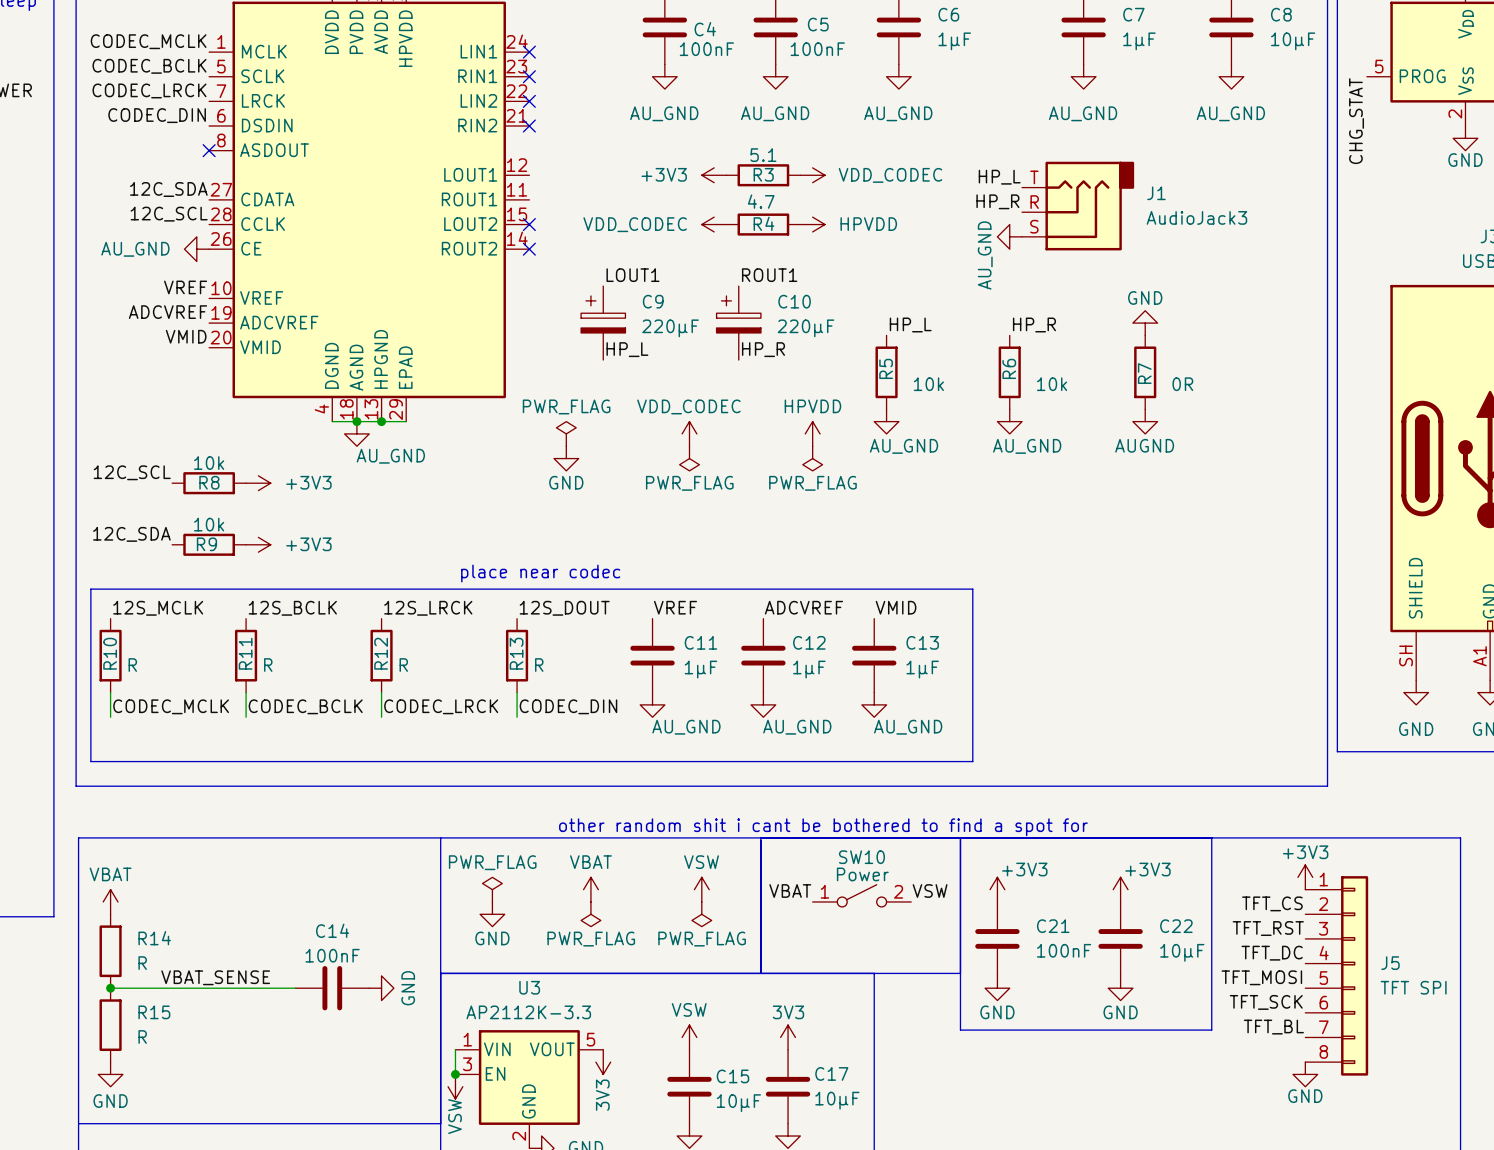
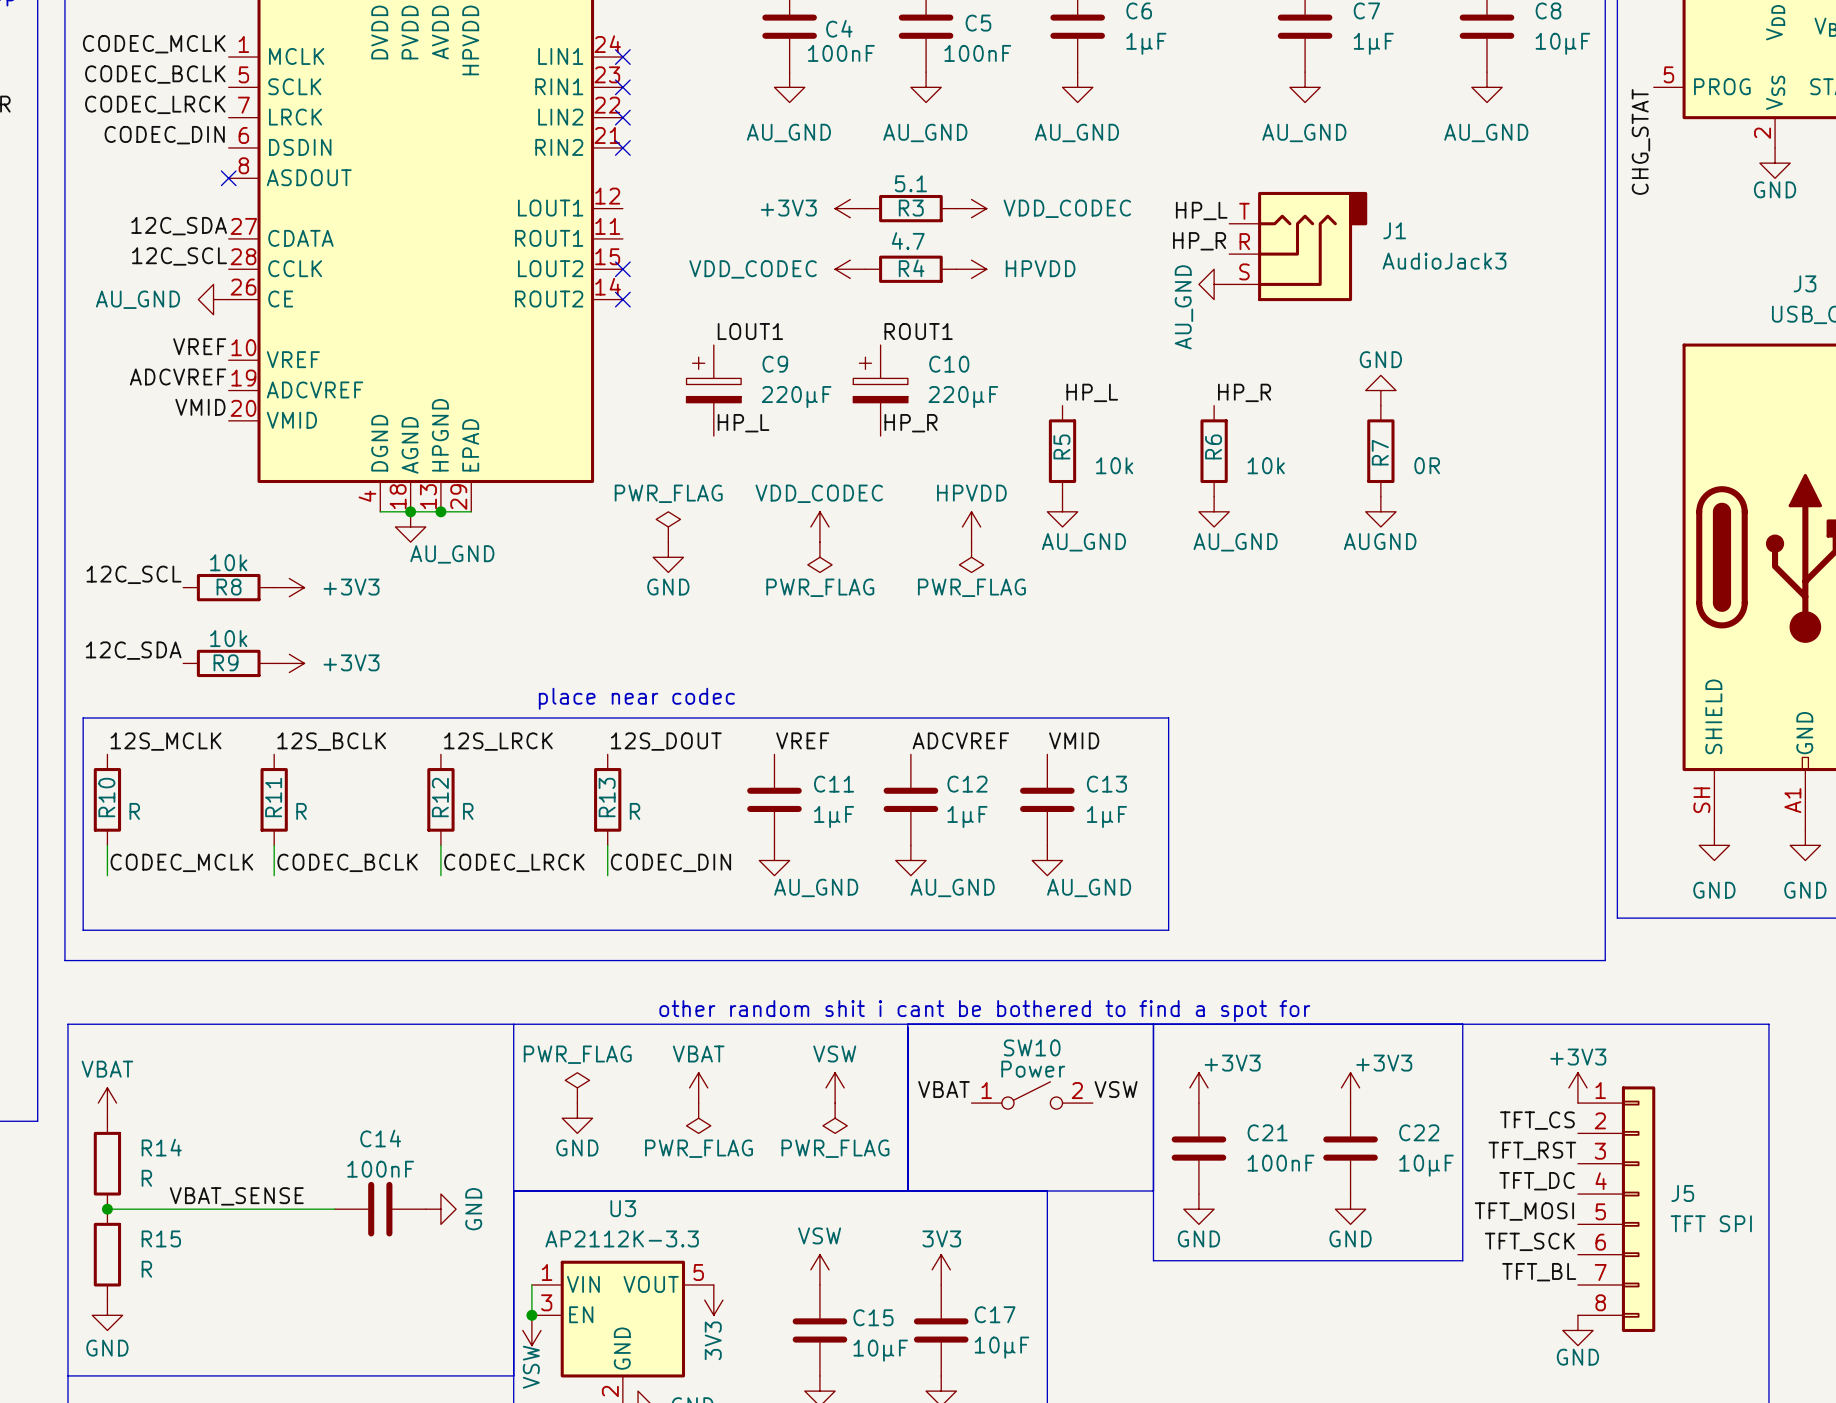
power symbol position: +3V3 (1305, 877) -> +3V3 (1577, 1087)
label position: TFT_CS (1272, 903) -> TFT_CS (1537, 1120)
label position: TFT_RST (1268, 928) -> TFT_RST (1532, 1150)
label position: TFT_DC (1272, 953) -> TFT_DC (1537, 1181)
J5 position: (1336, 975) -> (1616, 1209)
label position: TFT_MOSI (1261, 977) -> TFT_MOSI (1524, 1211)
label position: TFT_SCK (1266, 1002) -> TFT_SCK (1529, 1241)
label position: TFT_BL (1273, 1027) -> TFT_BL (1539, 1272)
power symbol position: GND (1305, 1074) -> GND (1577, 1330)

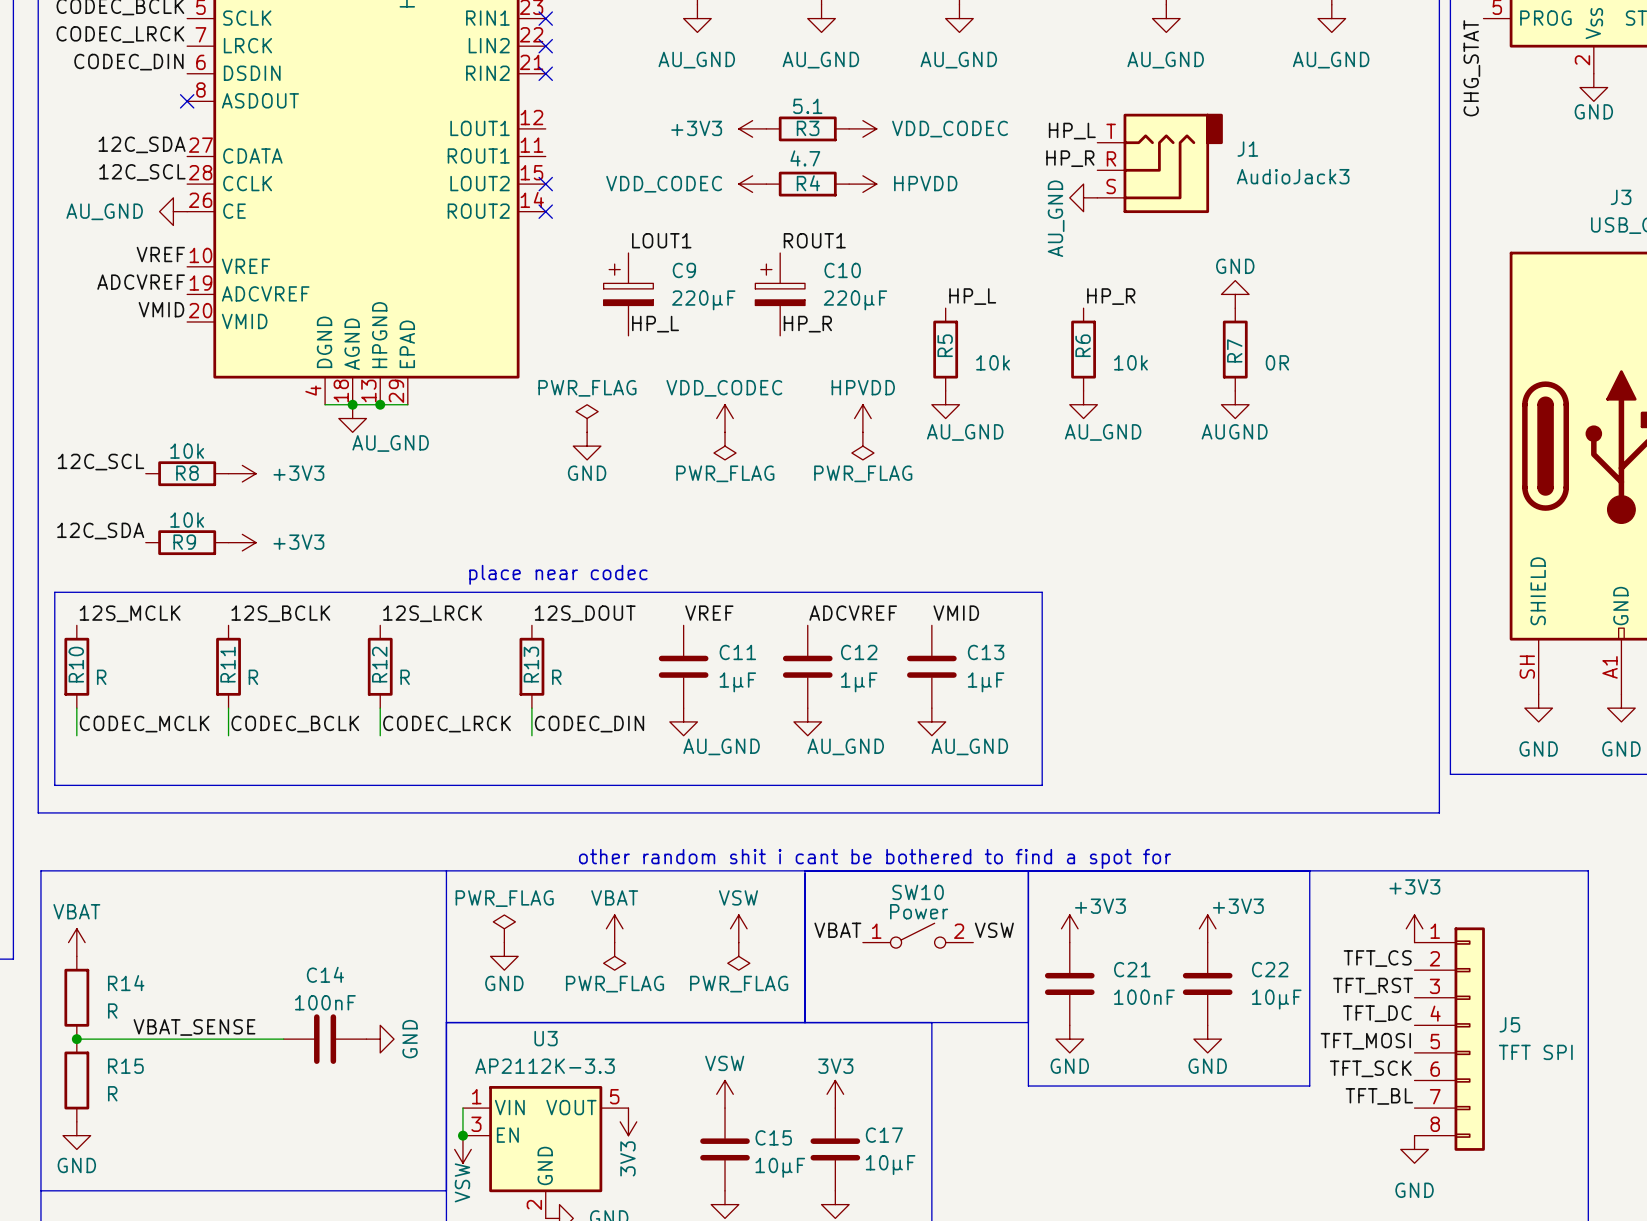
power symbol text position: +3V3 (1578, 1057) -> +3V3 (1414, 886)
power symbol text position: GND (1577, 1357) -> GND (1414, 1190)

